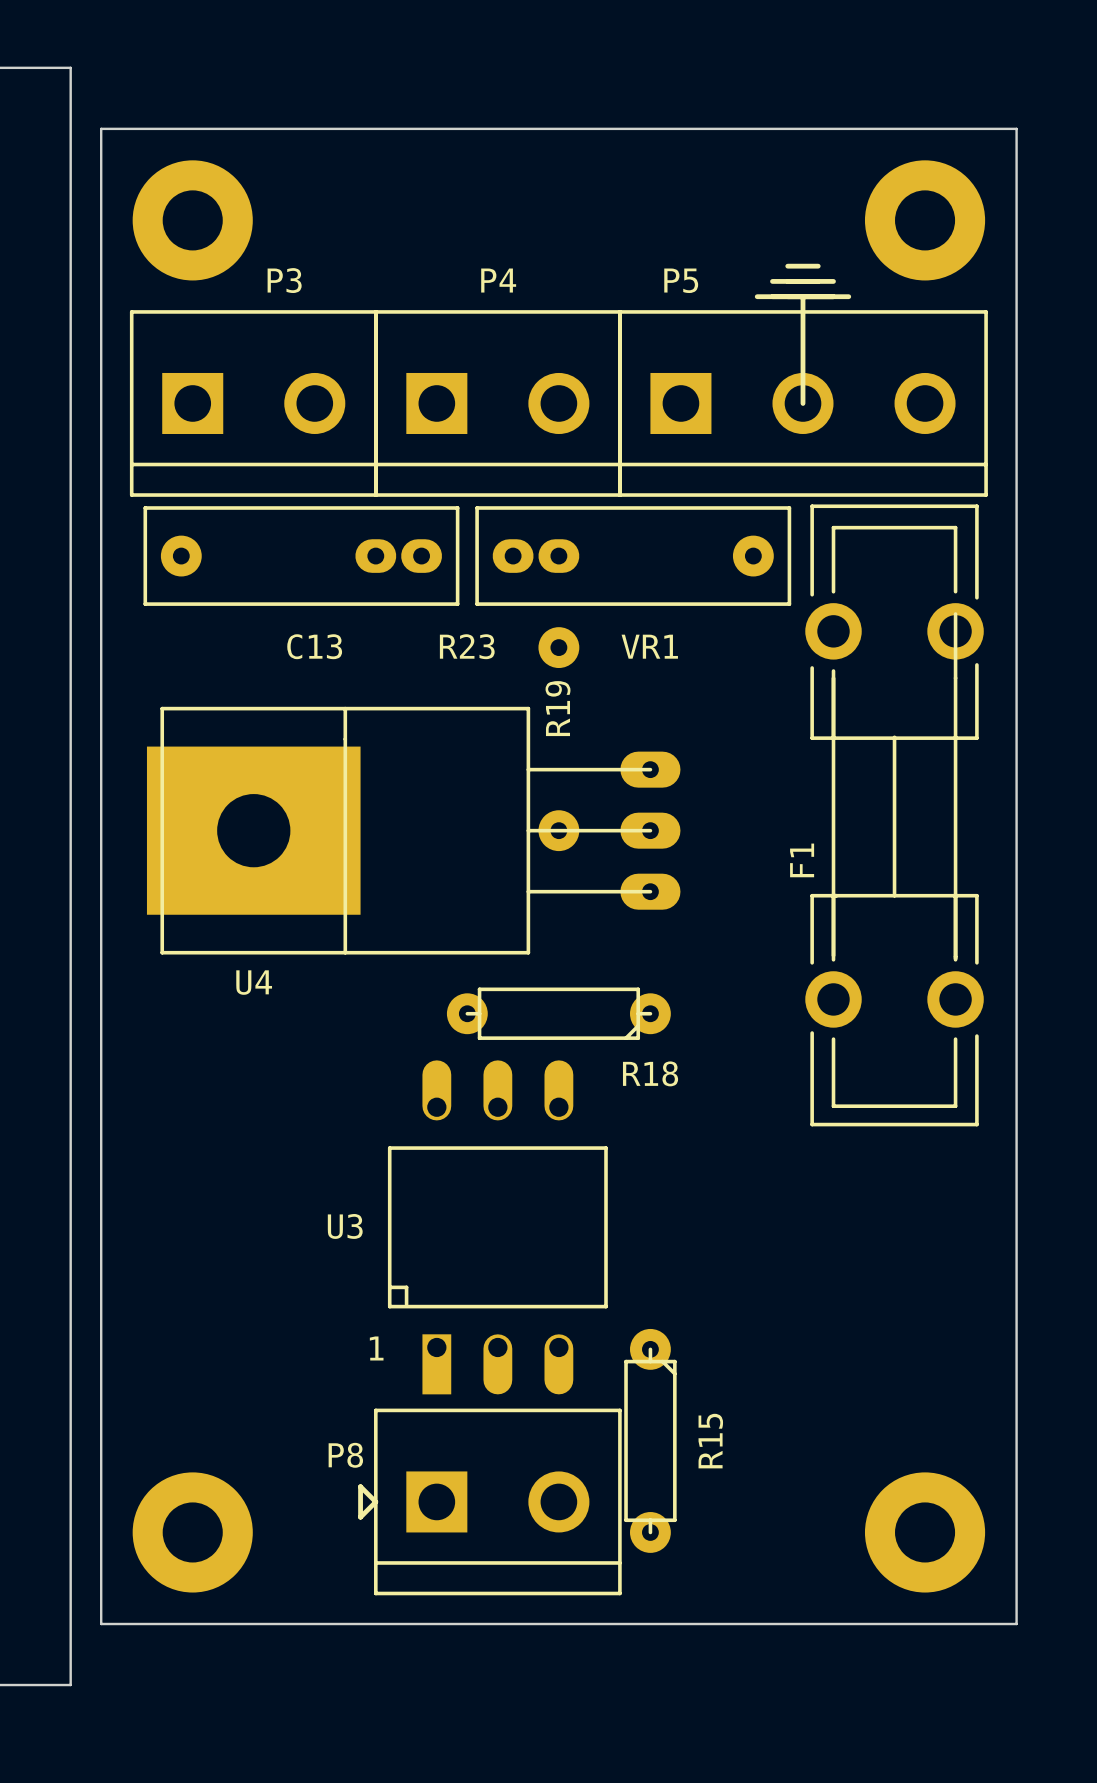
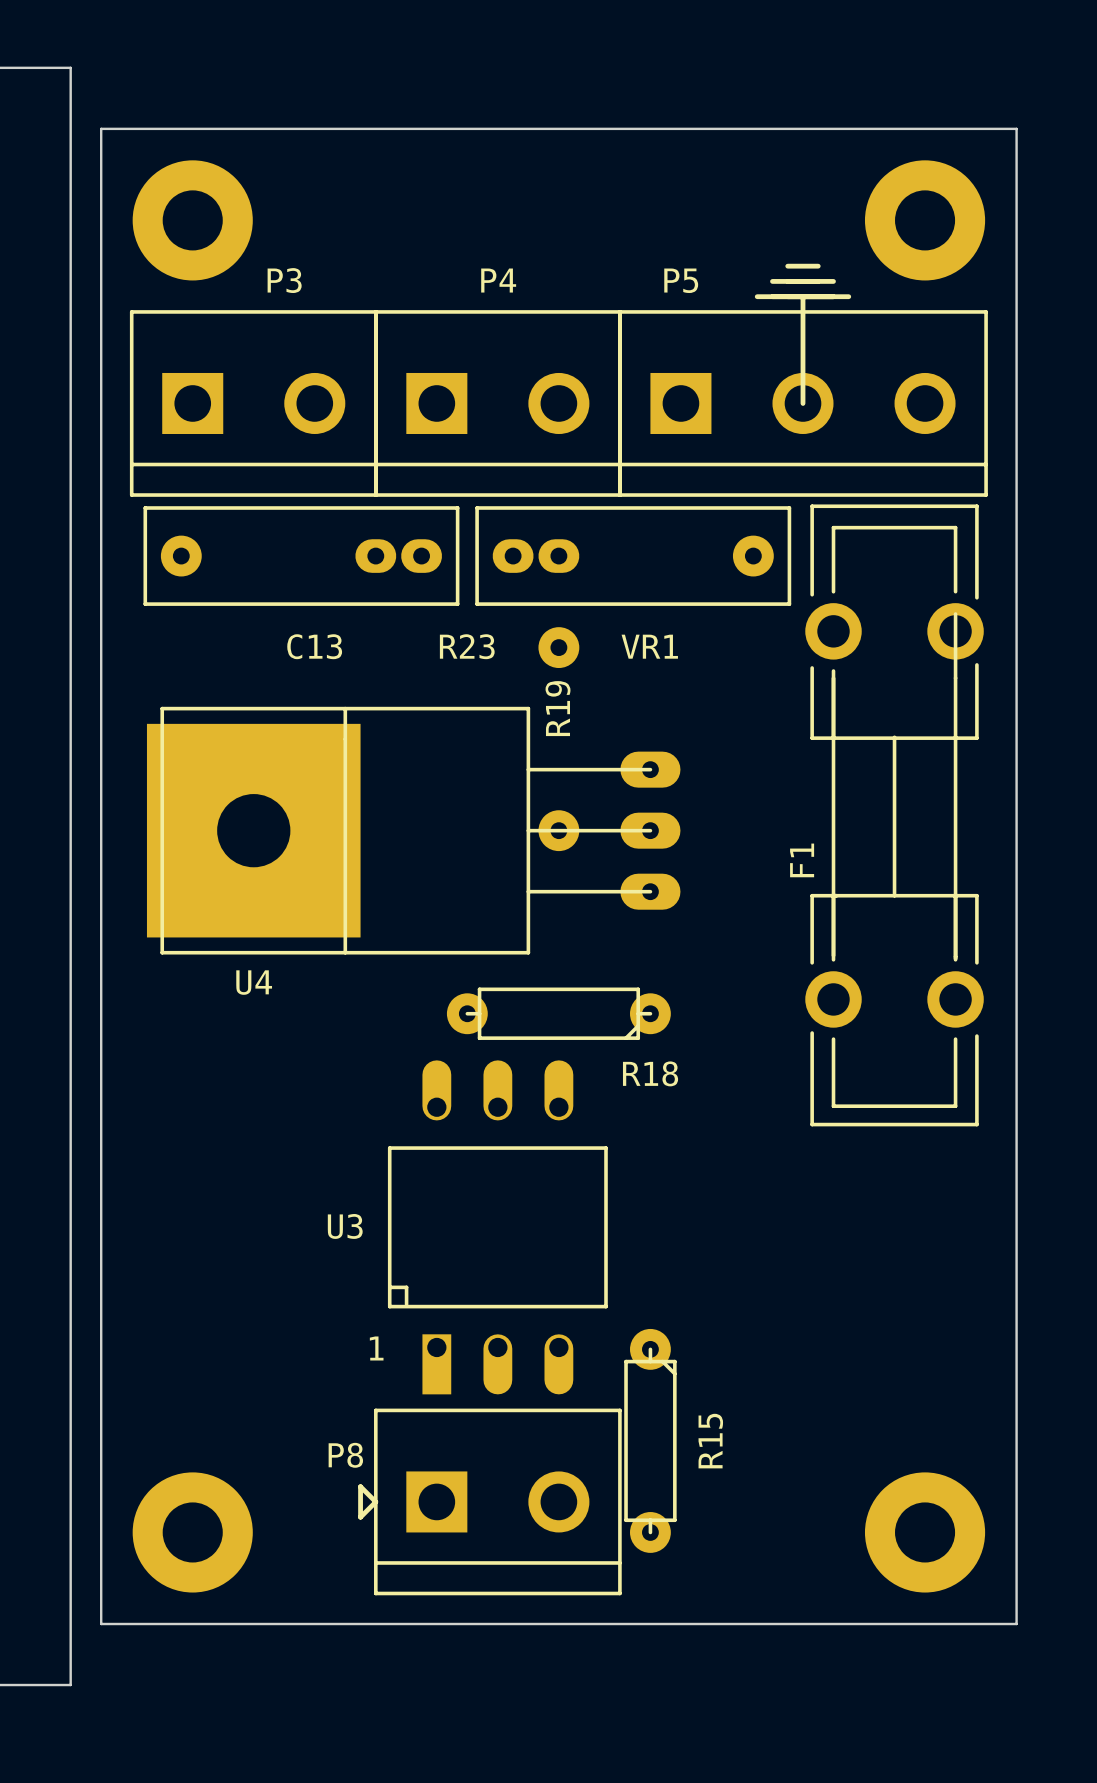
U4 footprint: [146, 706, 681, 955] -> [146, 706, 681, 955]

